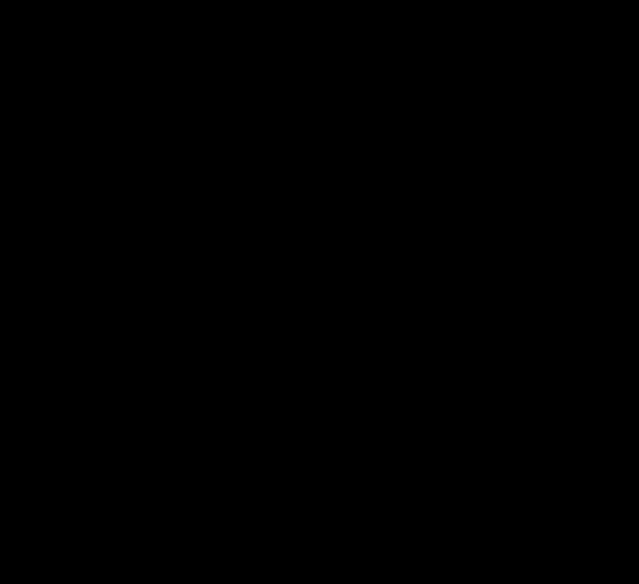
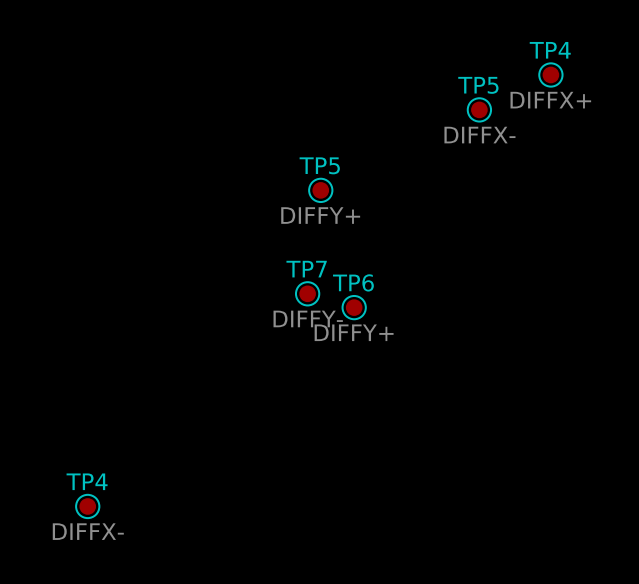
TP4: none -> DIFFX+ (550, 74)
TP5: none -> DIFFX- (479, 109)
TP5: none -> DIFFY+ (320, 190)
TP7: none -> DIFFY- (307, 293)
TP6: none -> DIFFY+ (354, 307)
TP4: none -> DIFFX- (87, 506)

